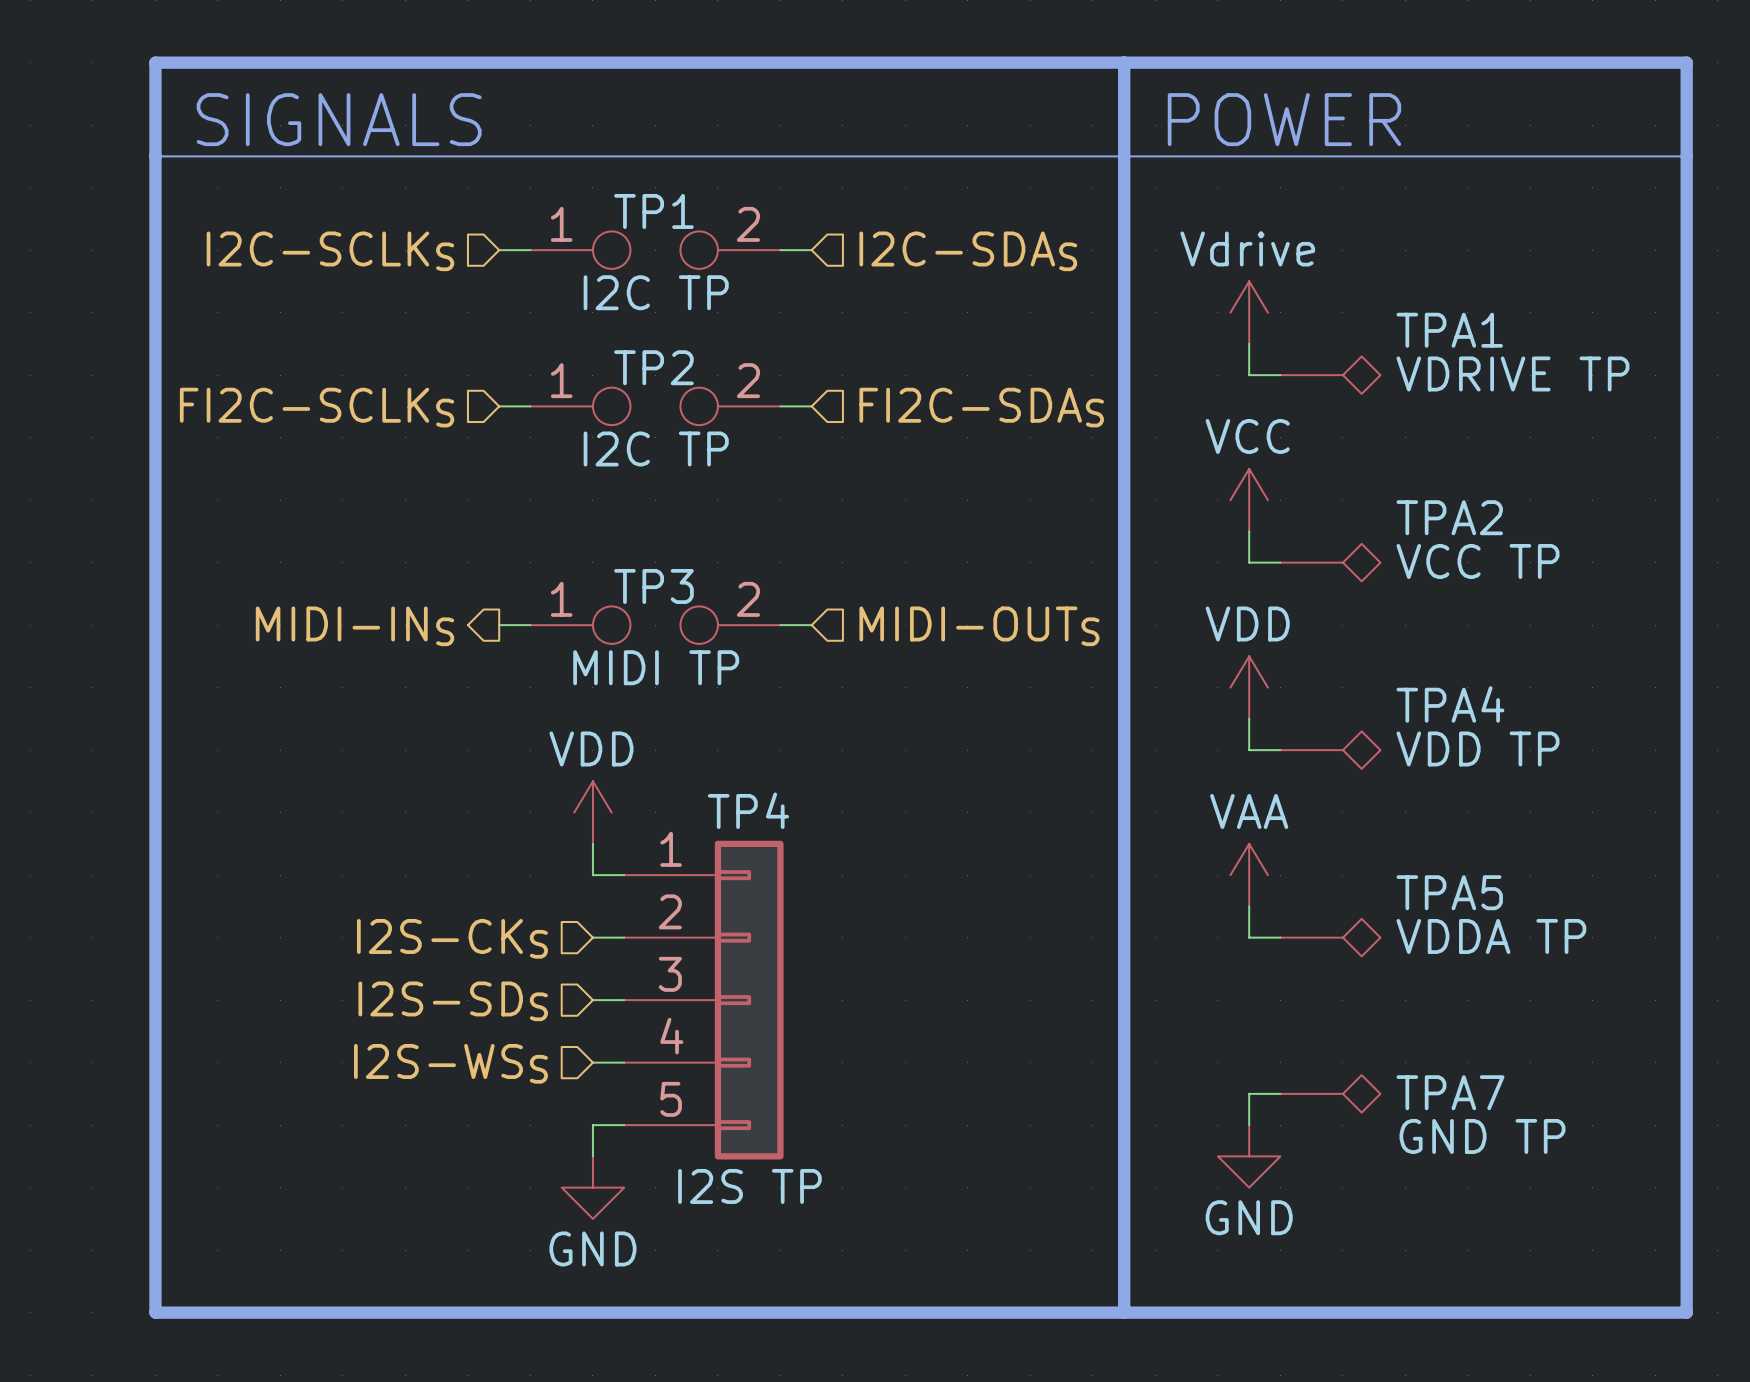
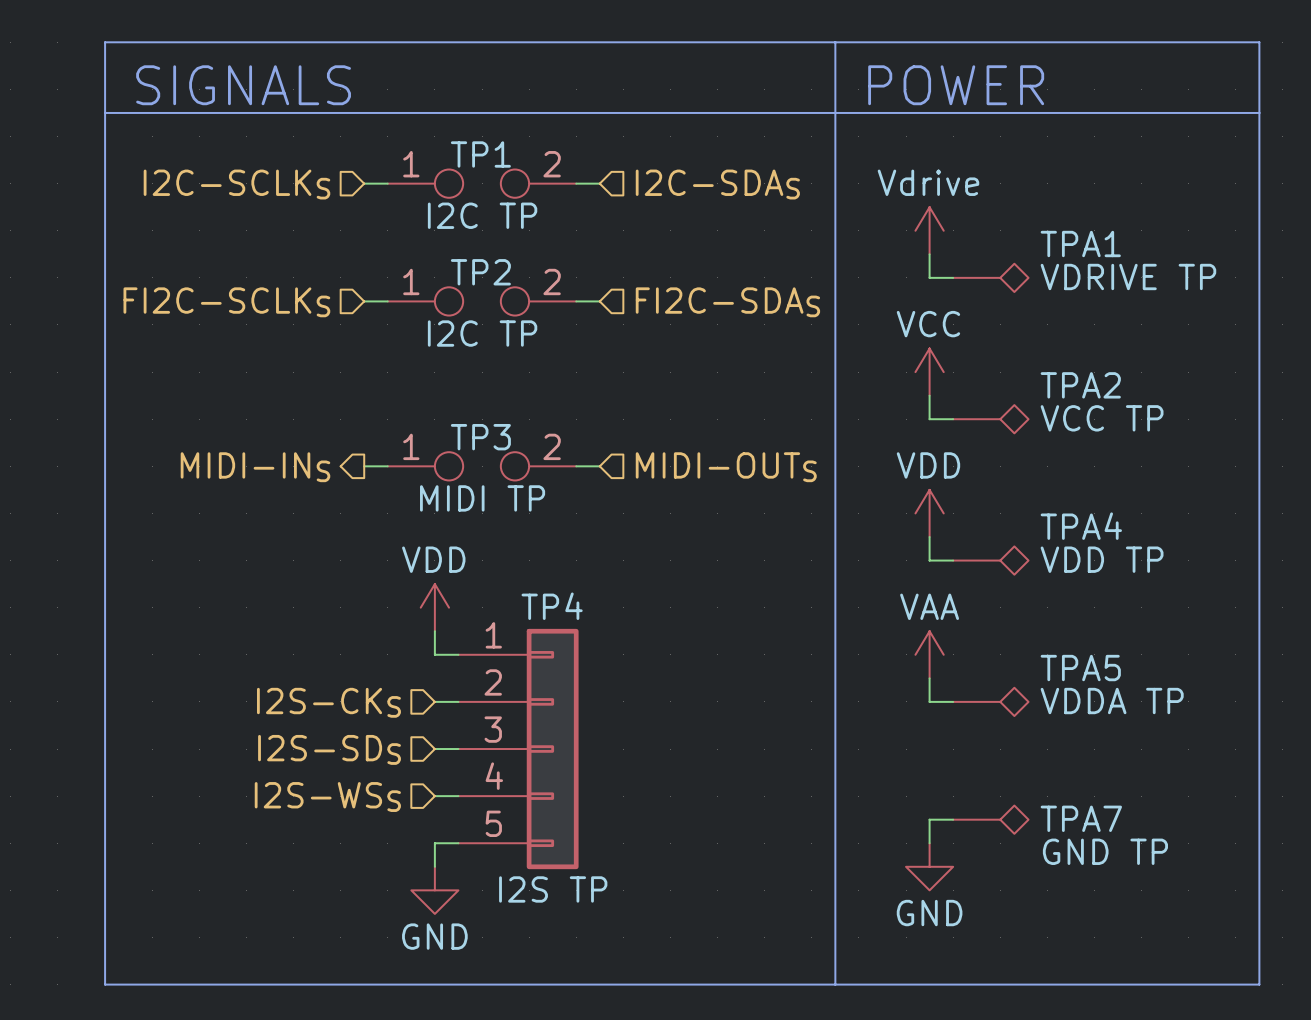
line width: thick (155, 62) (155, 1312) (1686, 1312) (1686, 62) (155, 62) -> thin (105, 42) (105, 984) (1259, 984) (1259, 42) (105, 42)
line width: thick (1124, 62) (1124, 1312) -> thin (835, 42) (835, 984)

